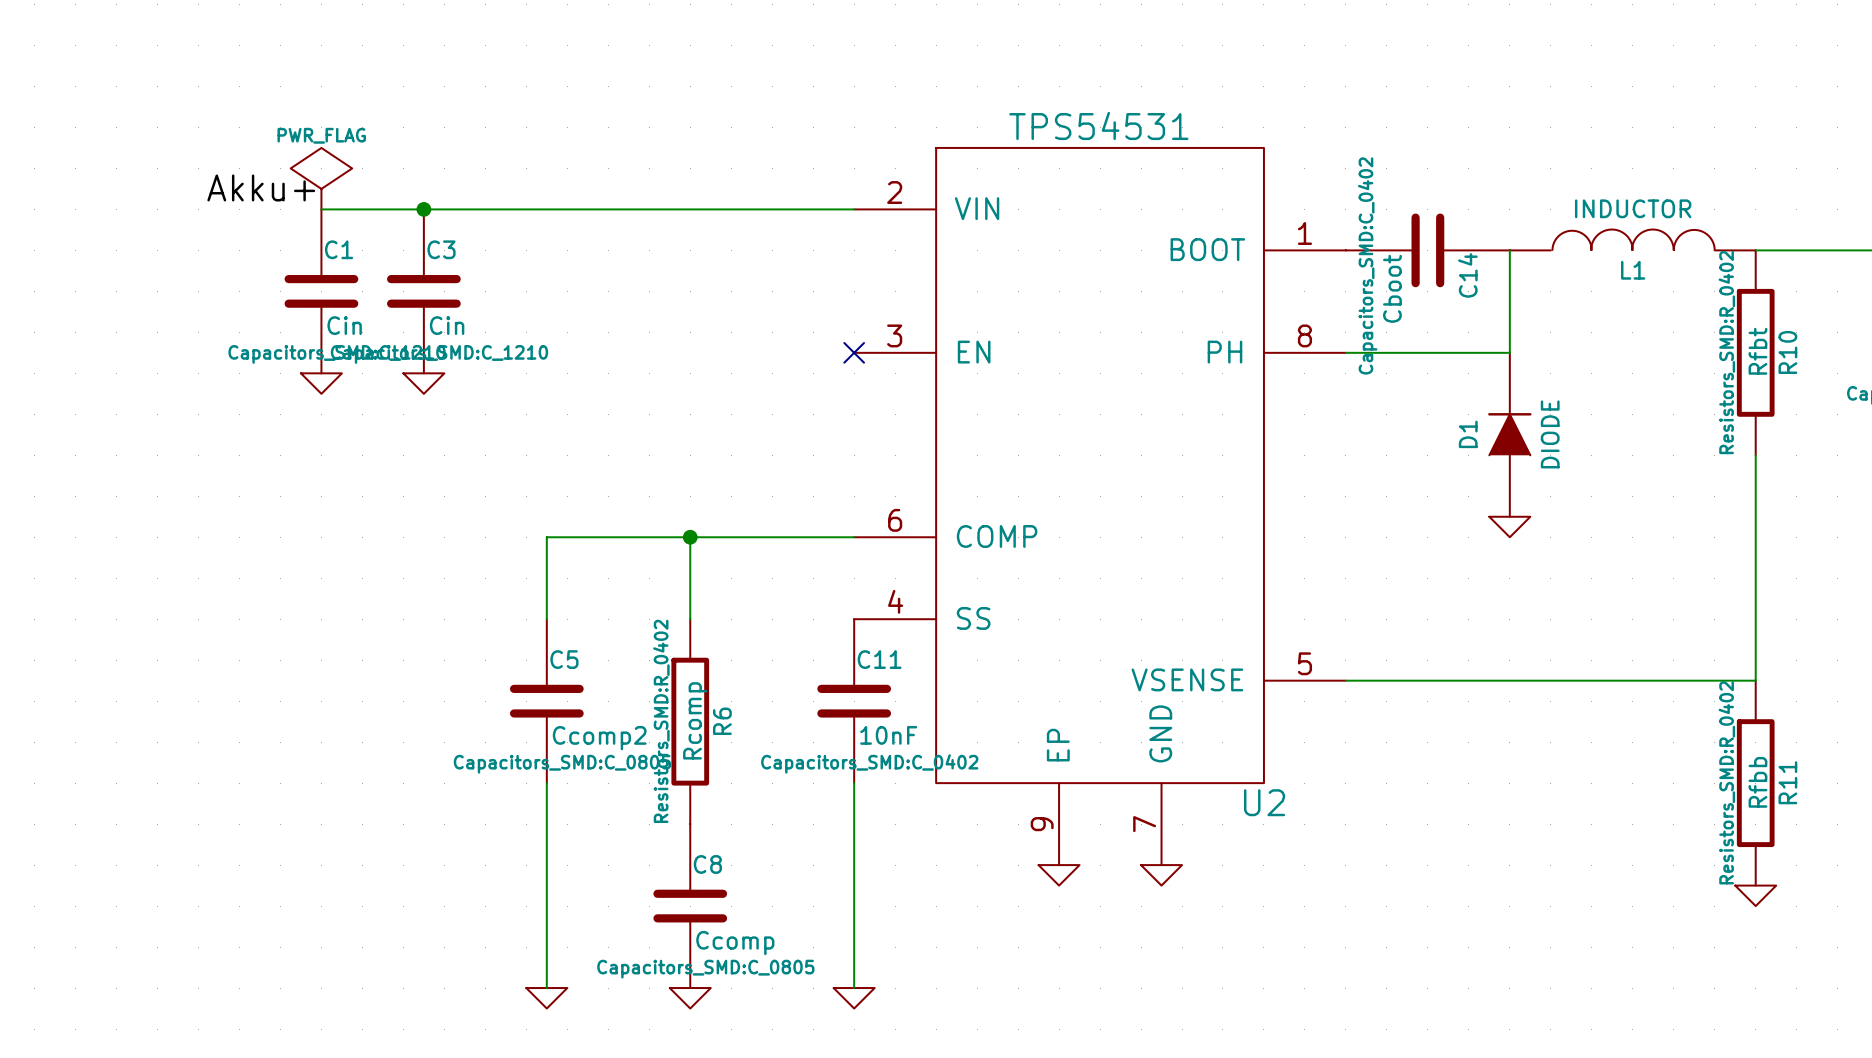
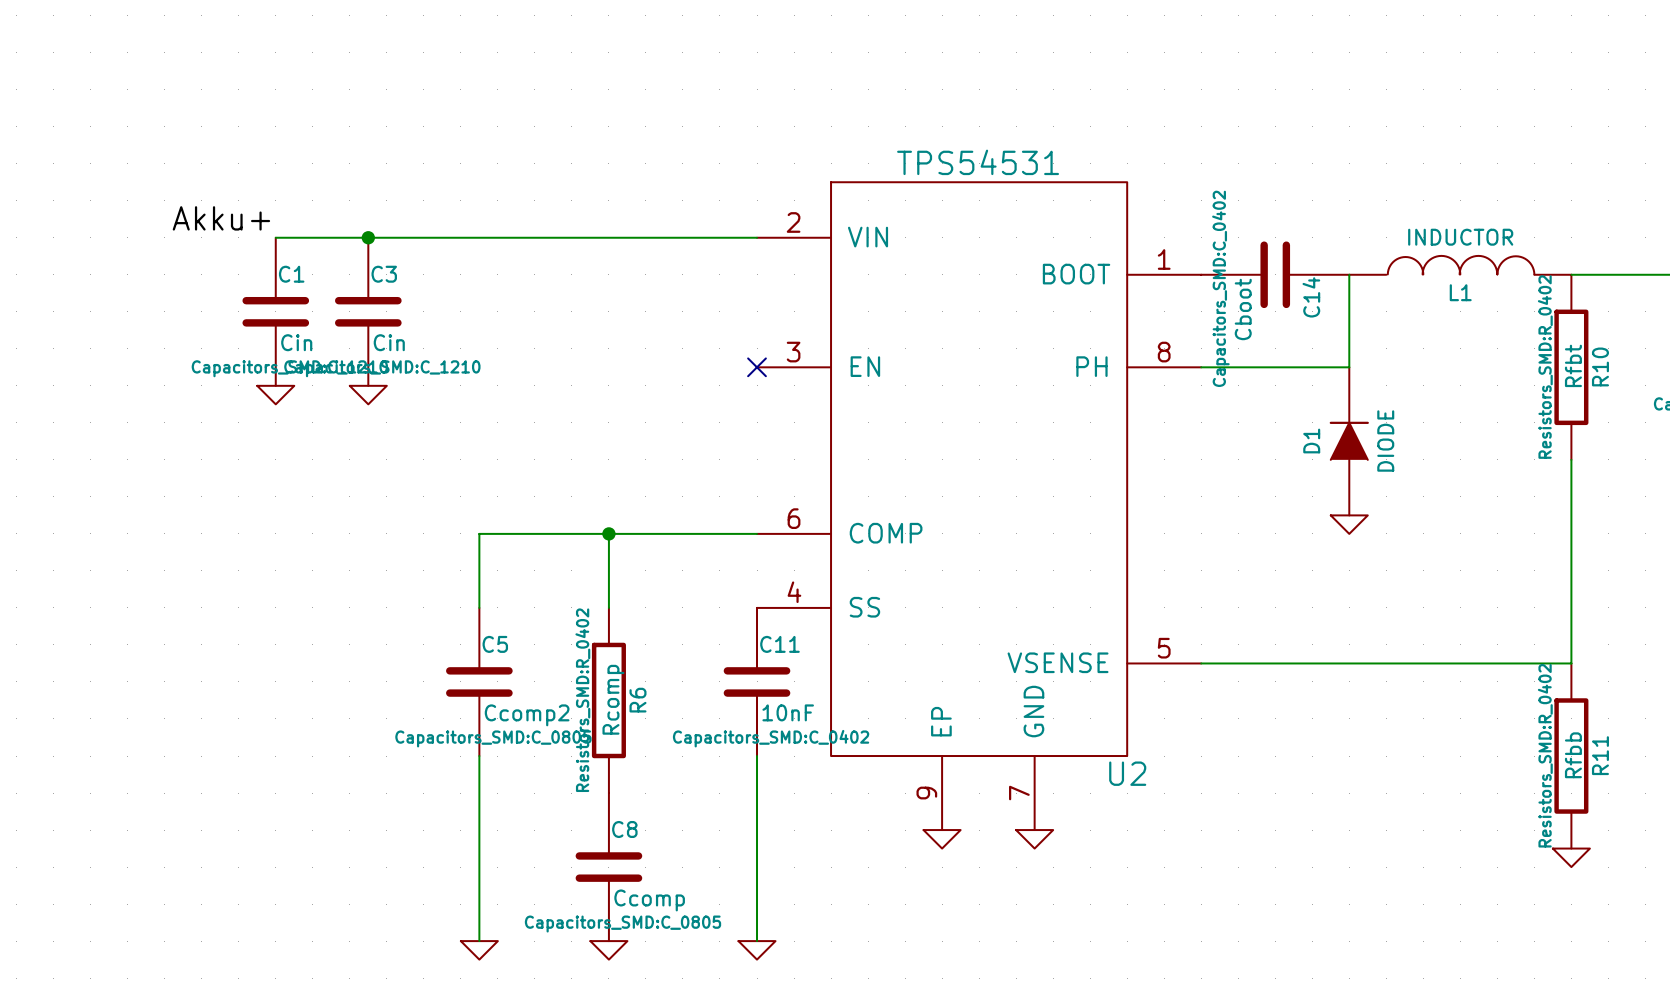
power symbol: PWR_FLAG (321, 178) -> none

